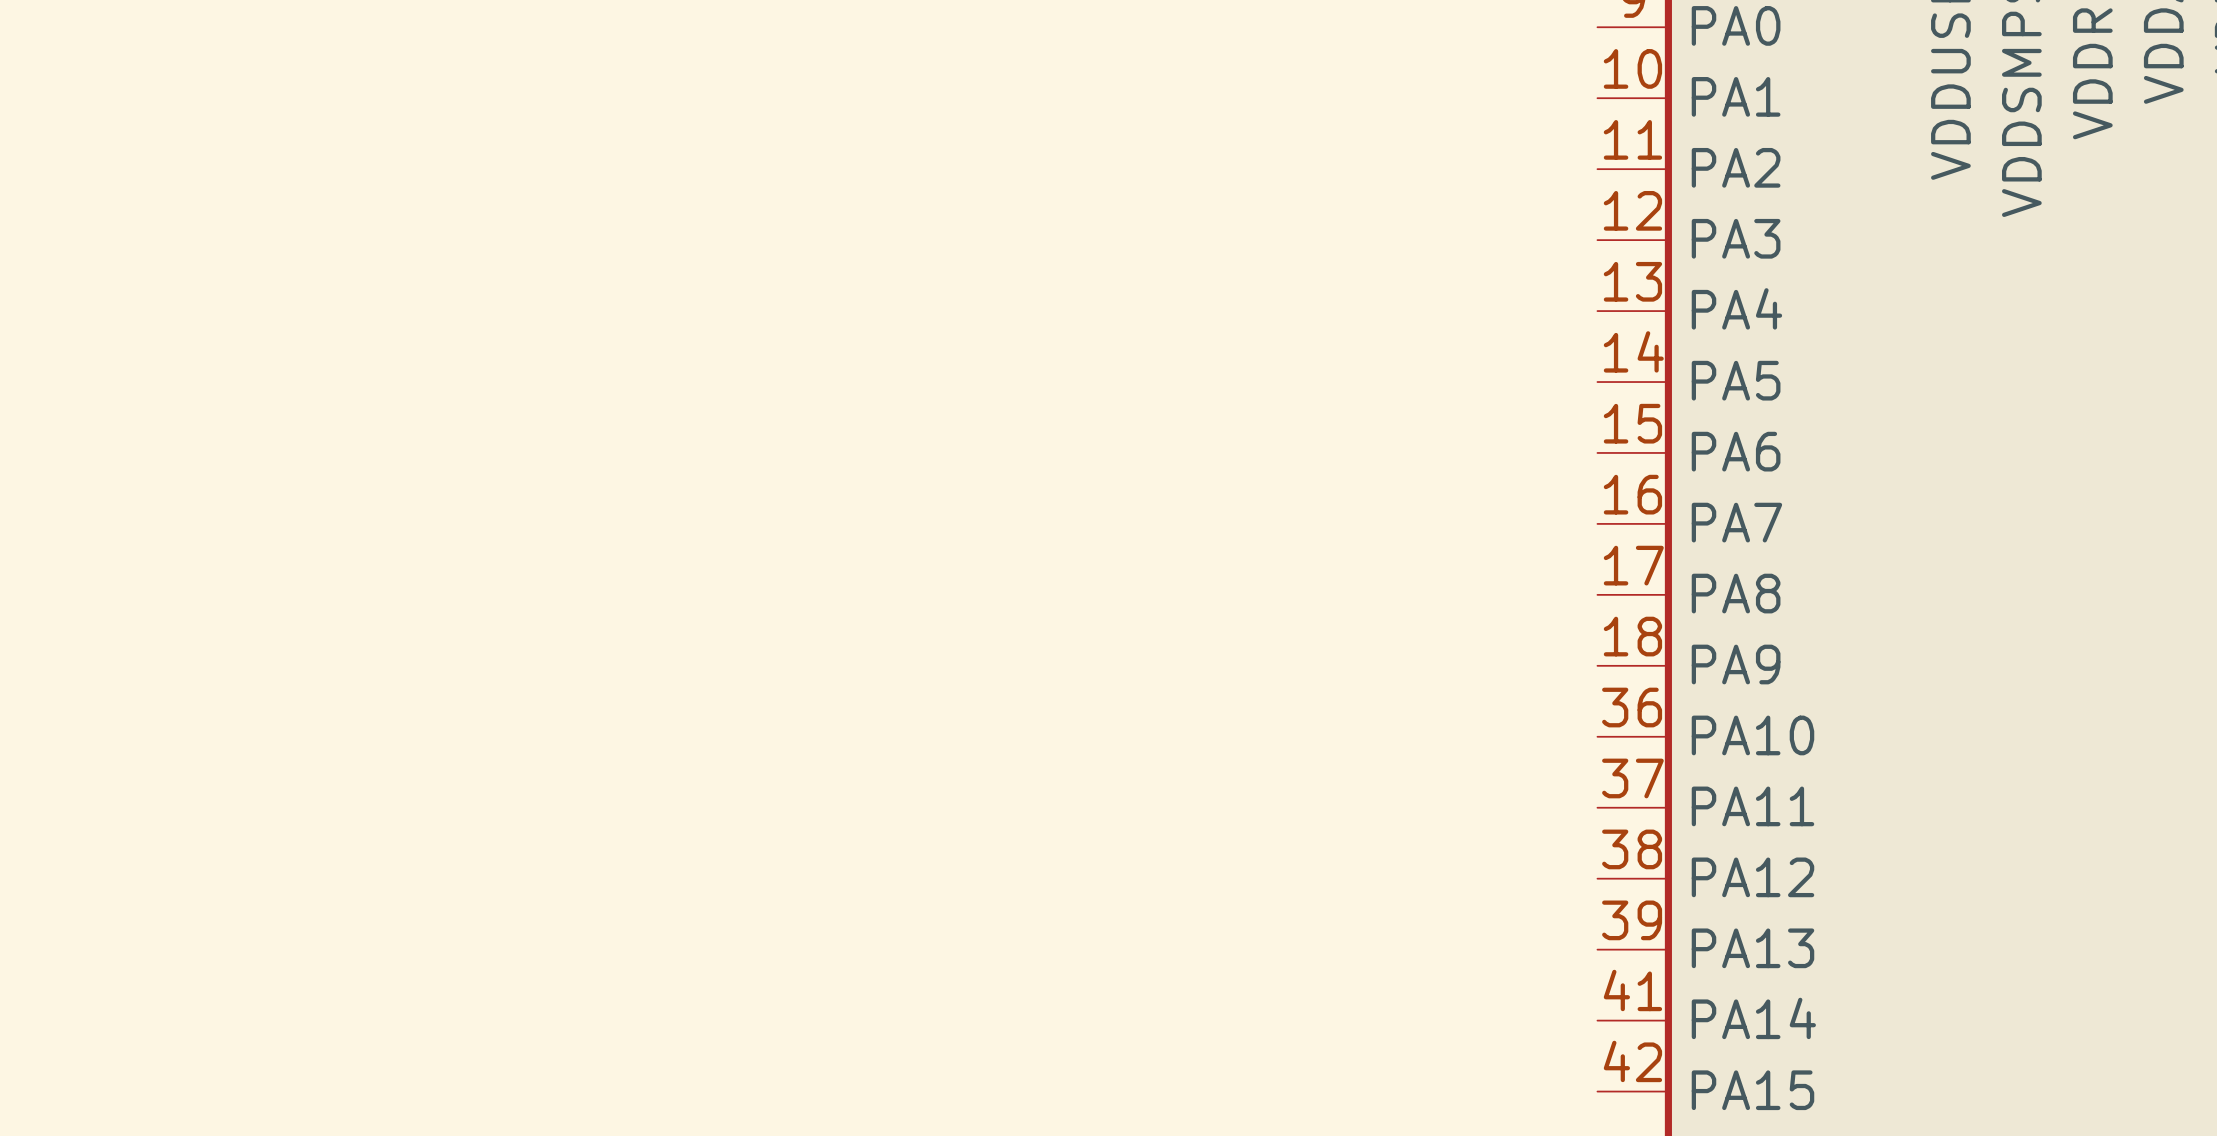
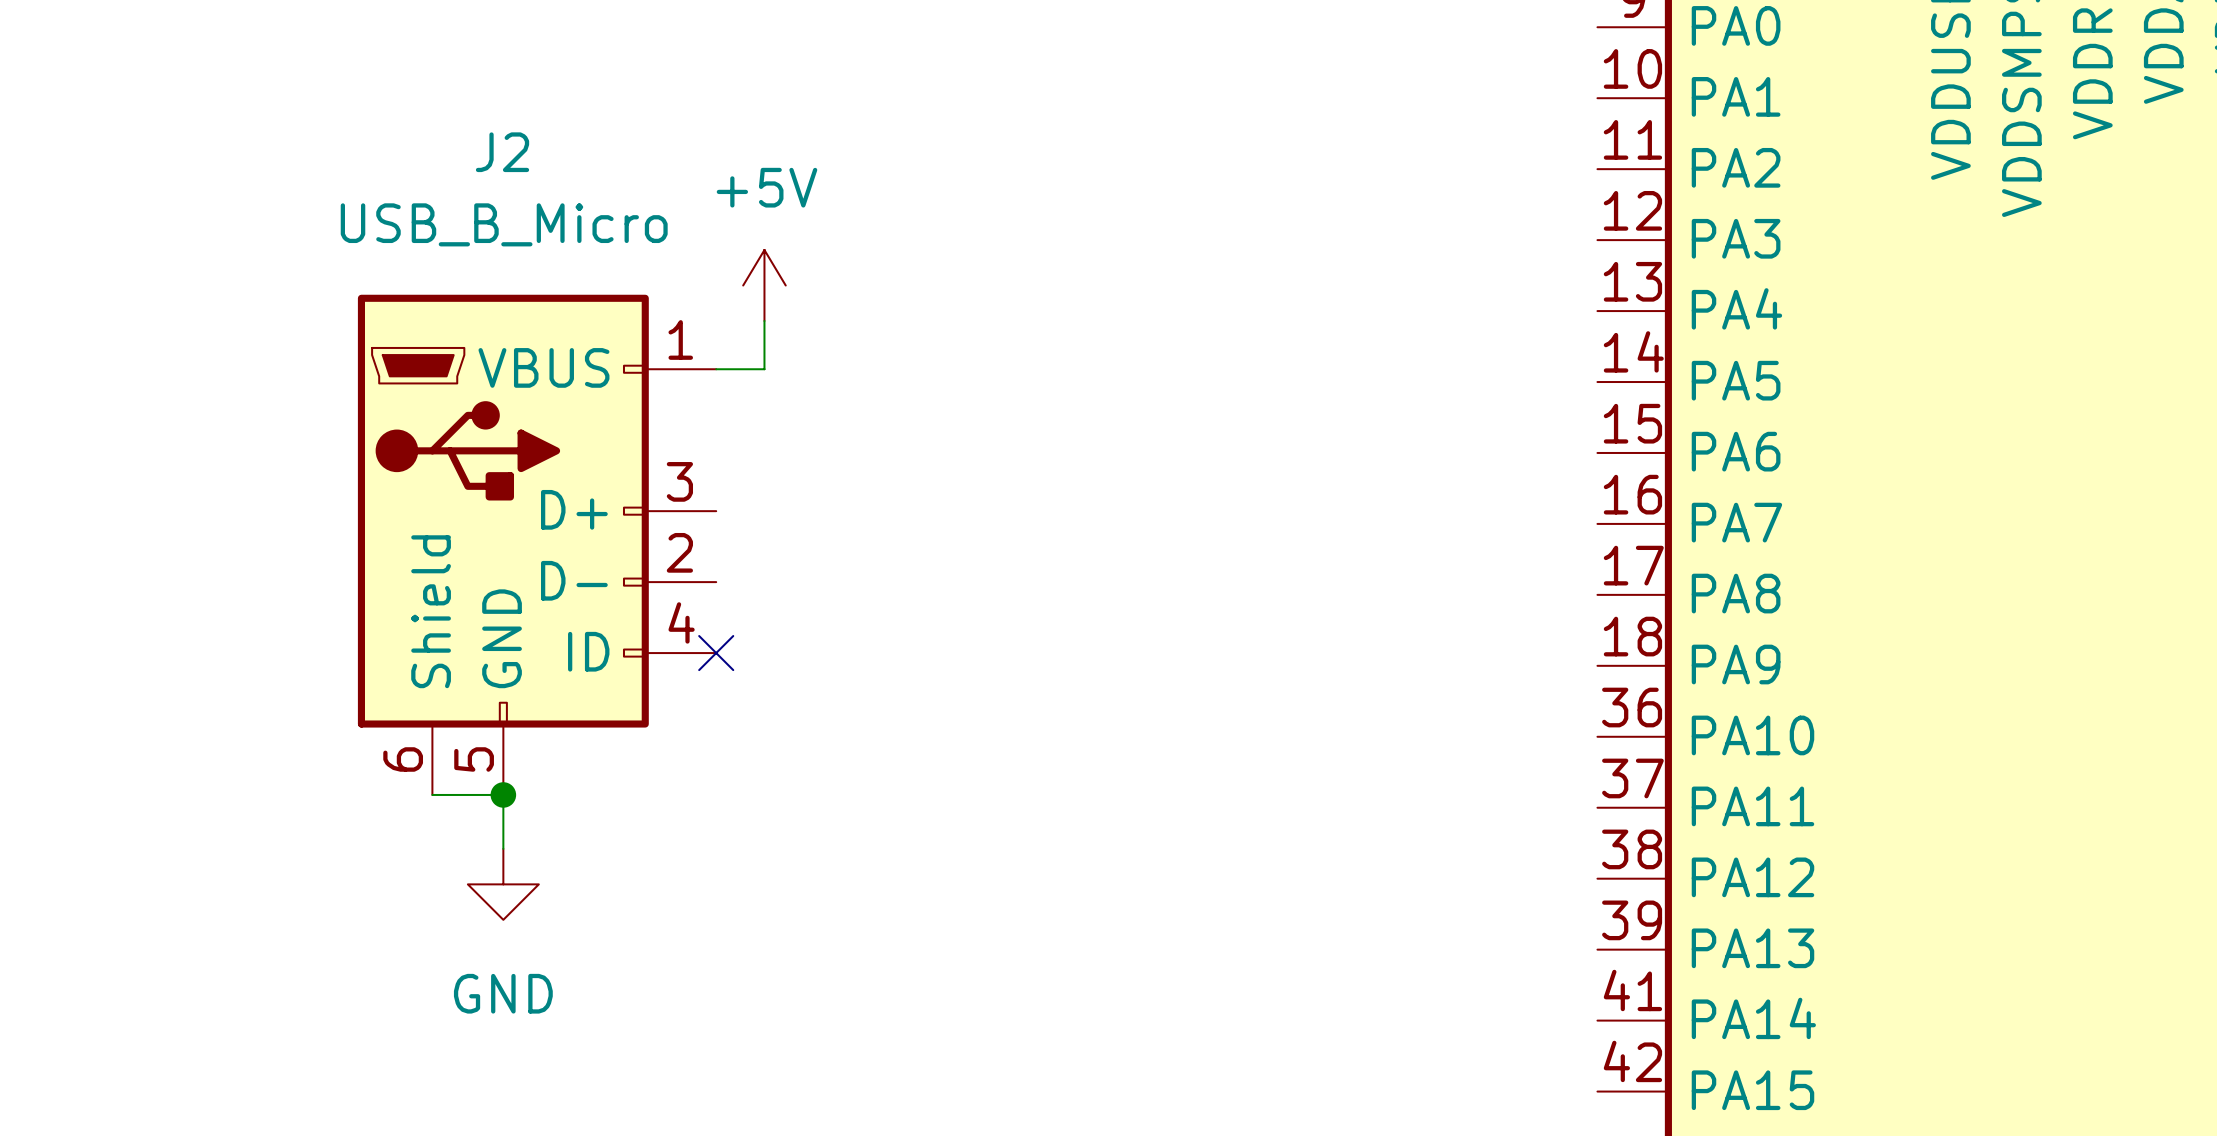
power symbol: none -> +5V (764, 285)
wire: none -> (764, 320) (764, 369) (716, 369)
J2: none -> USB_B_Micro (537, 544)
no-connect mark: none -> (716, 653)
wire: none -> (432, 794) (503, 794) (503, 848)
junction: none -> (503, 794)
power symbol: none -> GND (503, 884)

